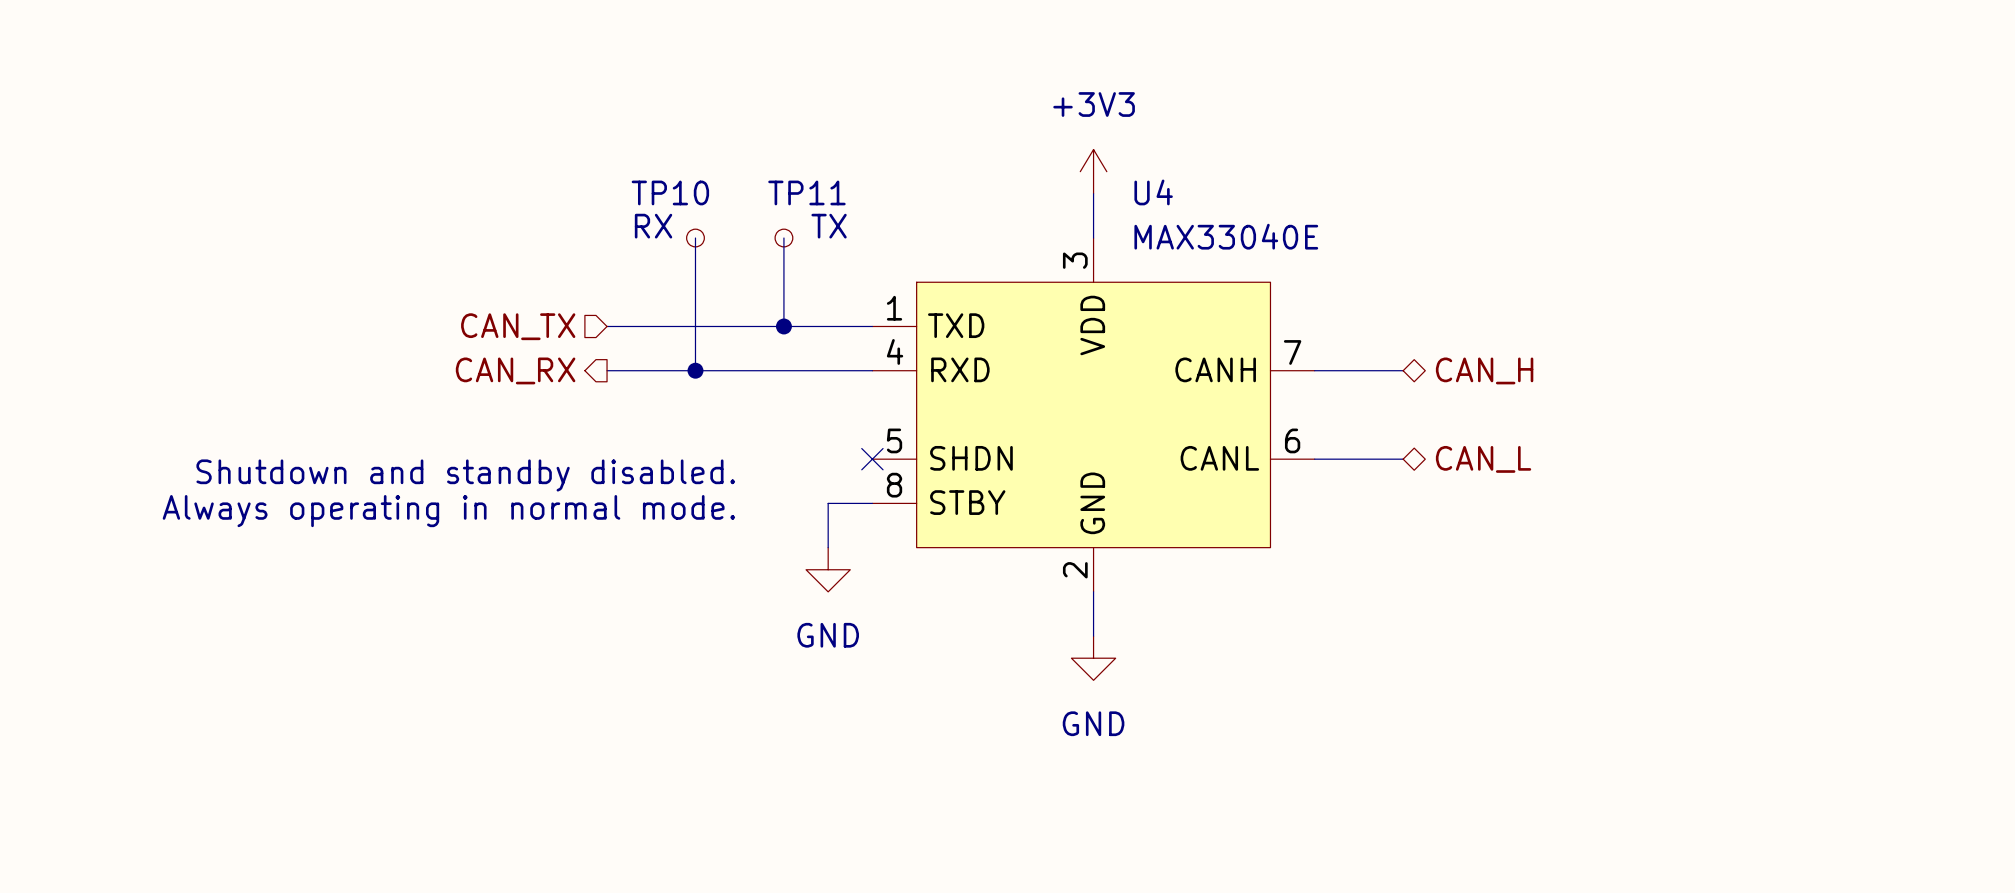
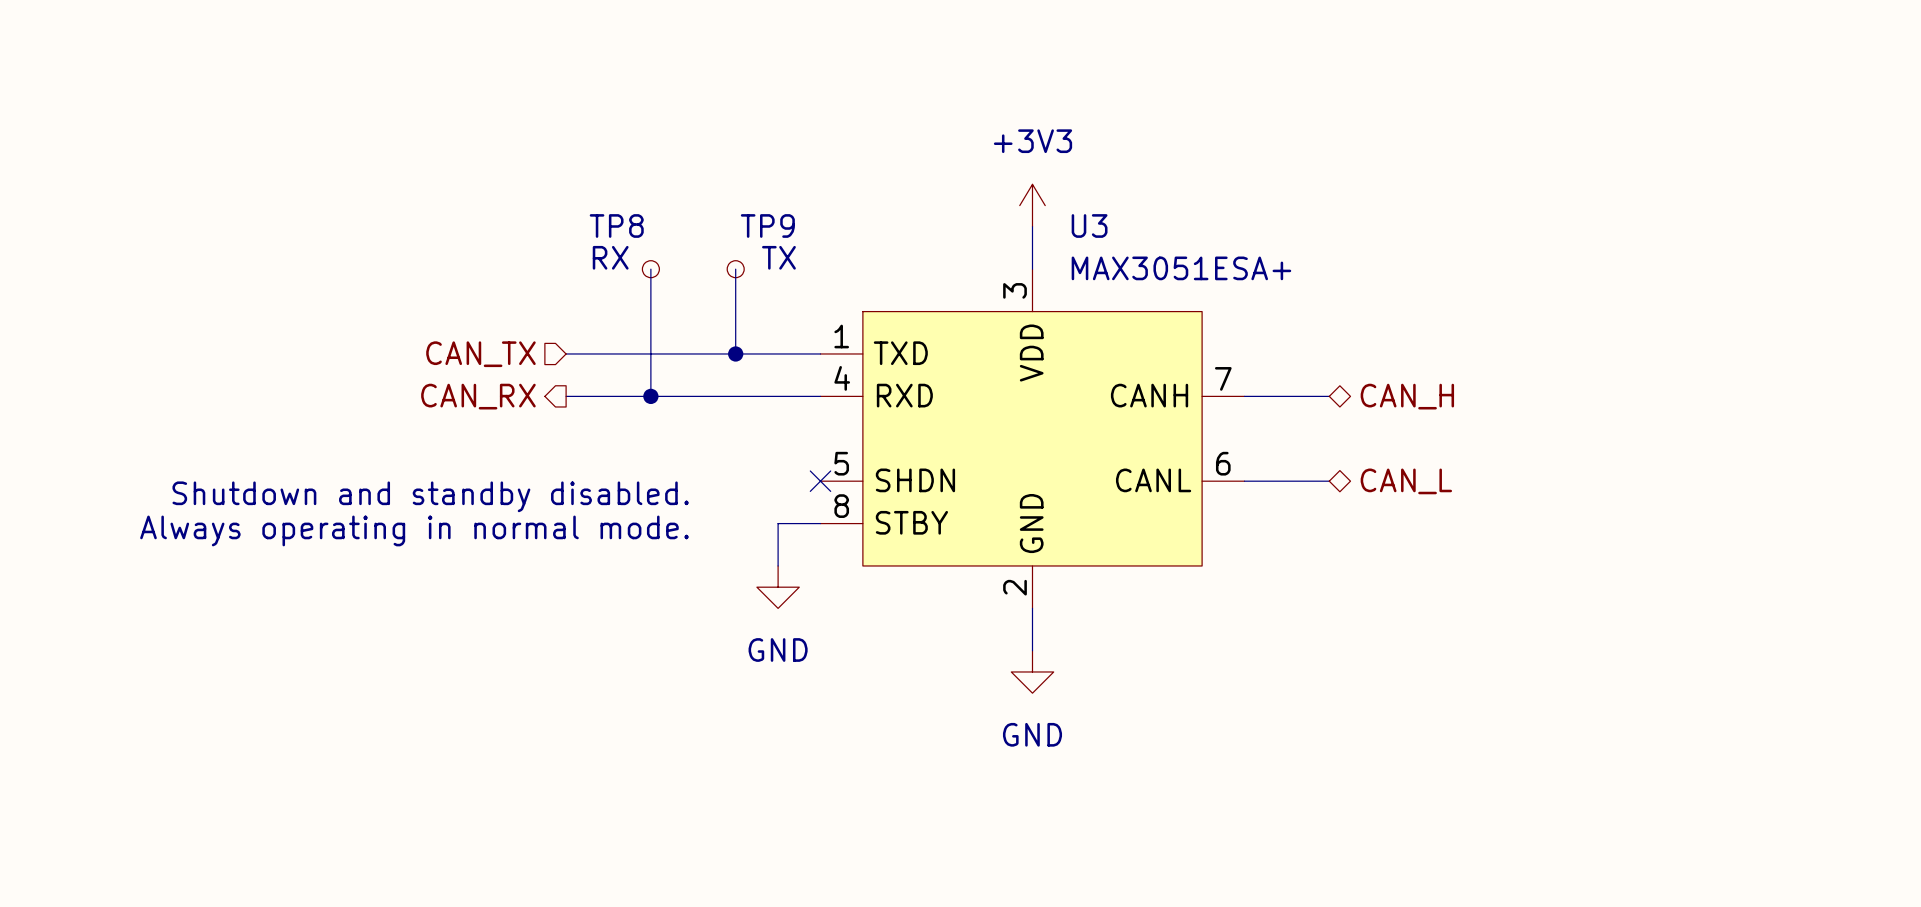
TP10 name: TP10 (670, 192) -> TP8 (616, 225)
TP11 name: TP11 (806, 192) -> TP9 (767, 225)
U4 name: U4 (1153, 192) -> U3 (1089, 225)
U4 value: MAX33040E (1226, 236) -> MAX3051ESA+ (1181, 268)

